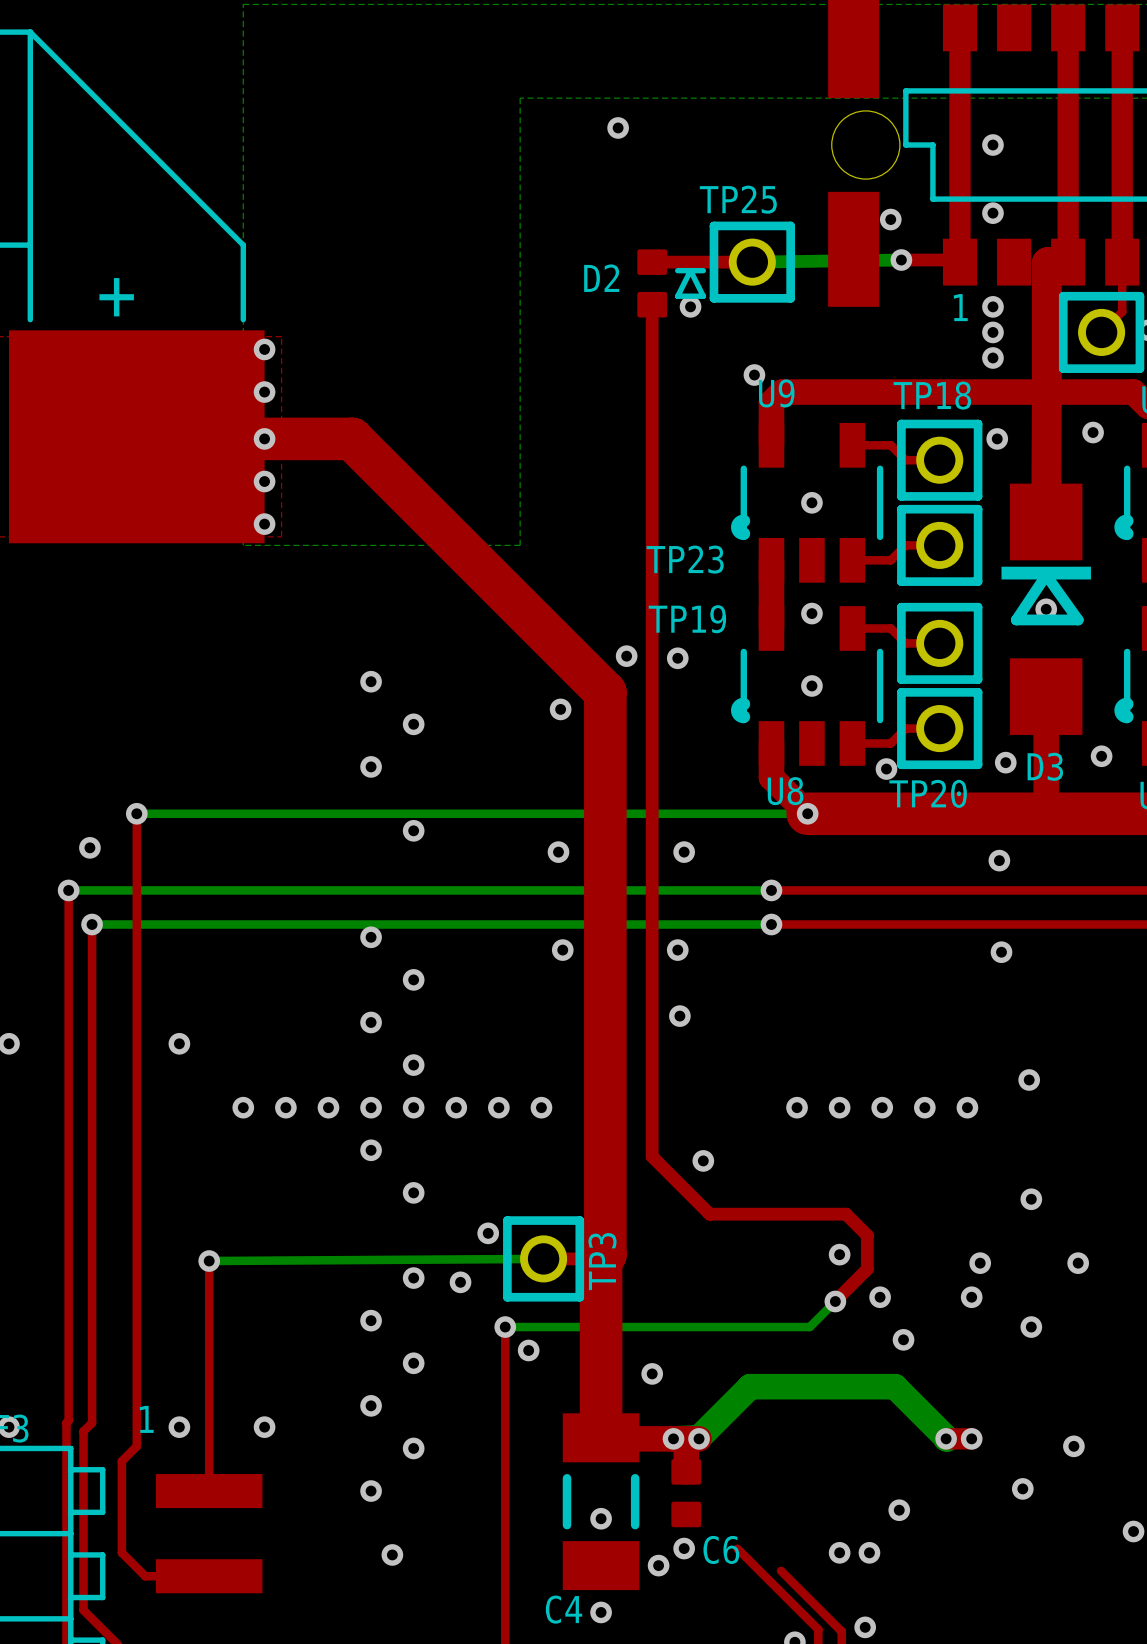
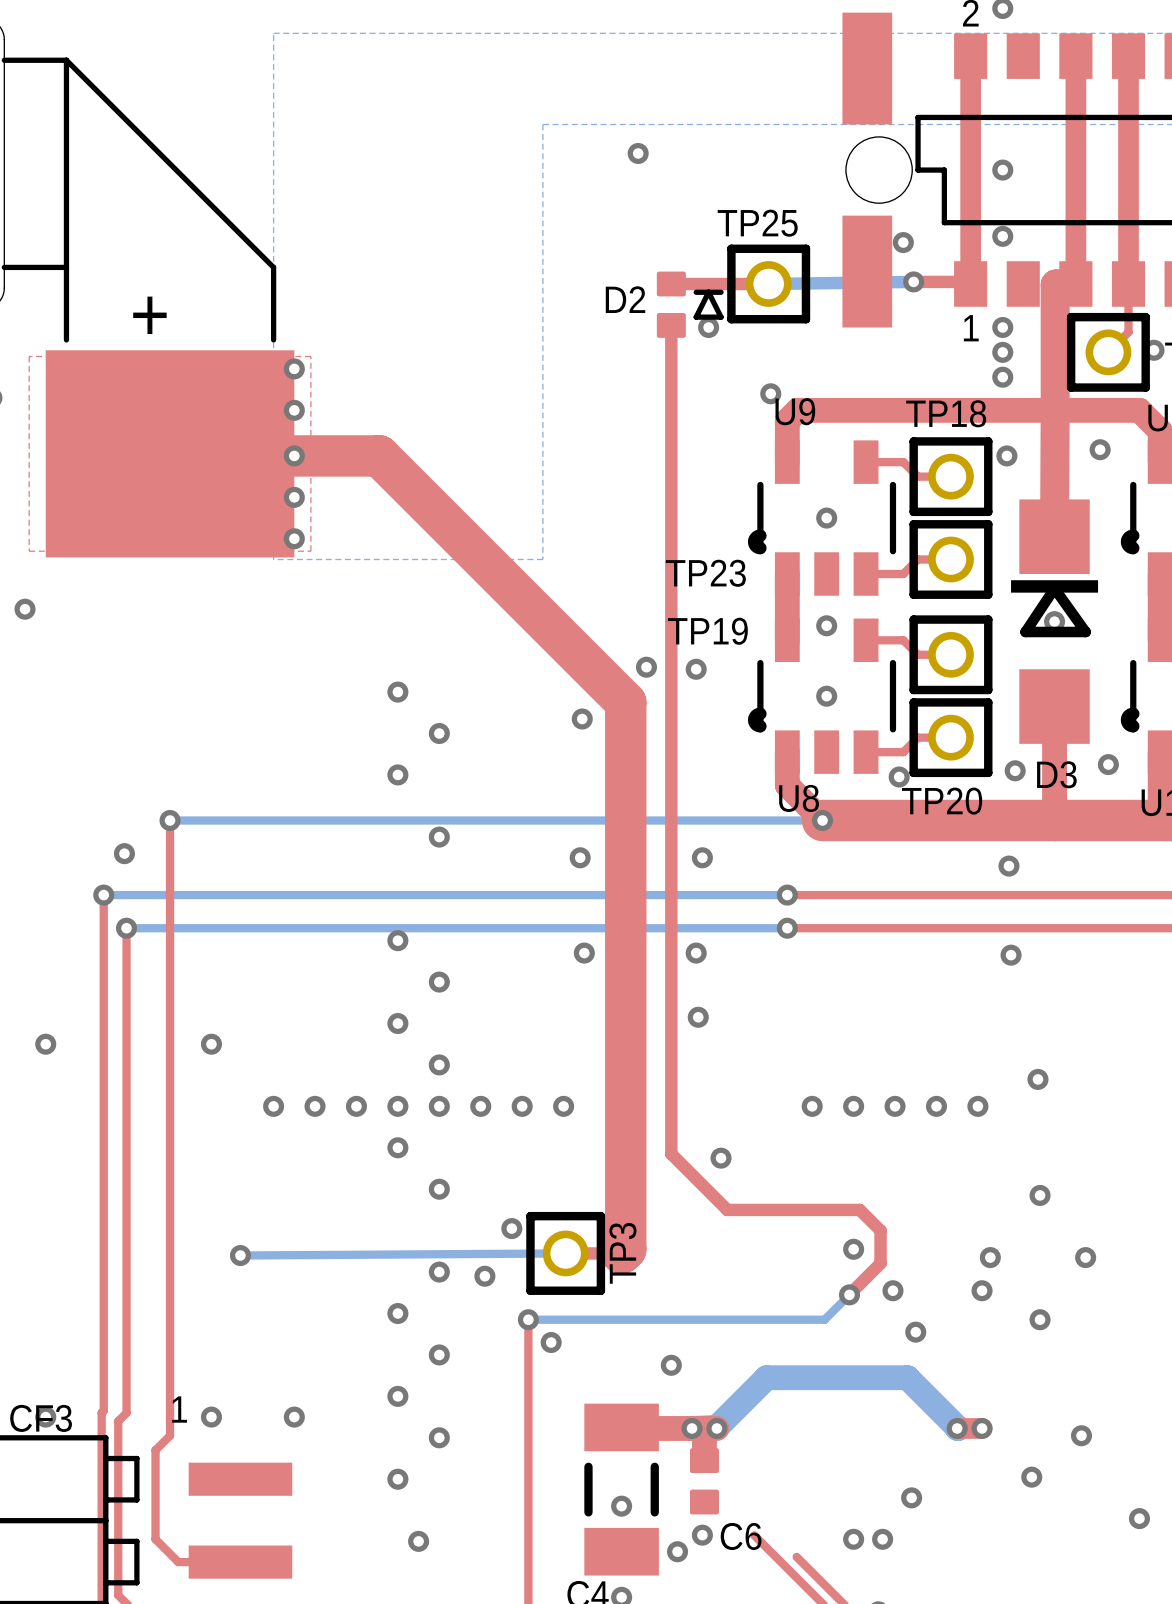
top track: (601, 1258) (601, 1437) -> none
top track: (209, 1261) (209, 1491) -> none

